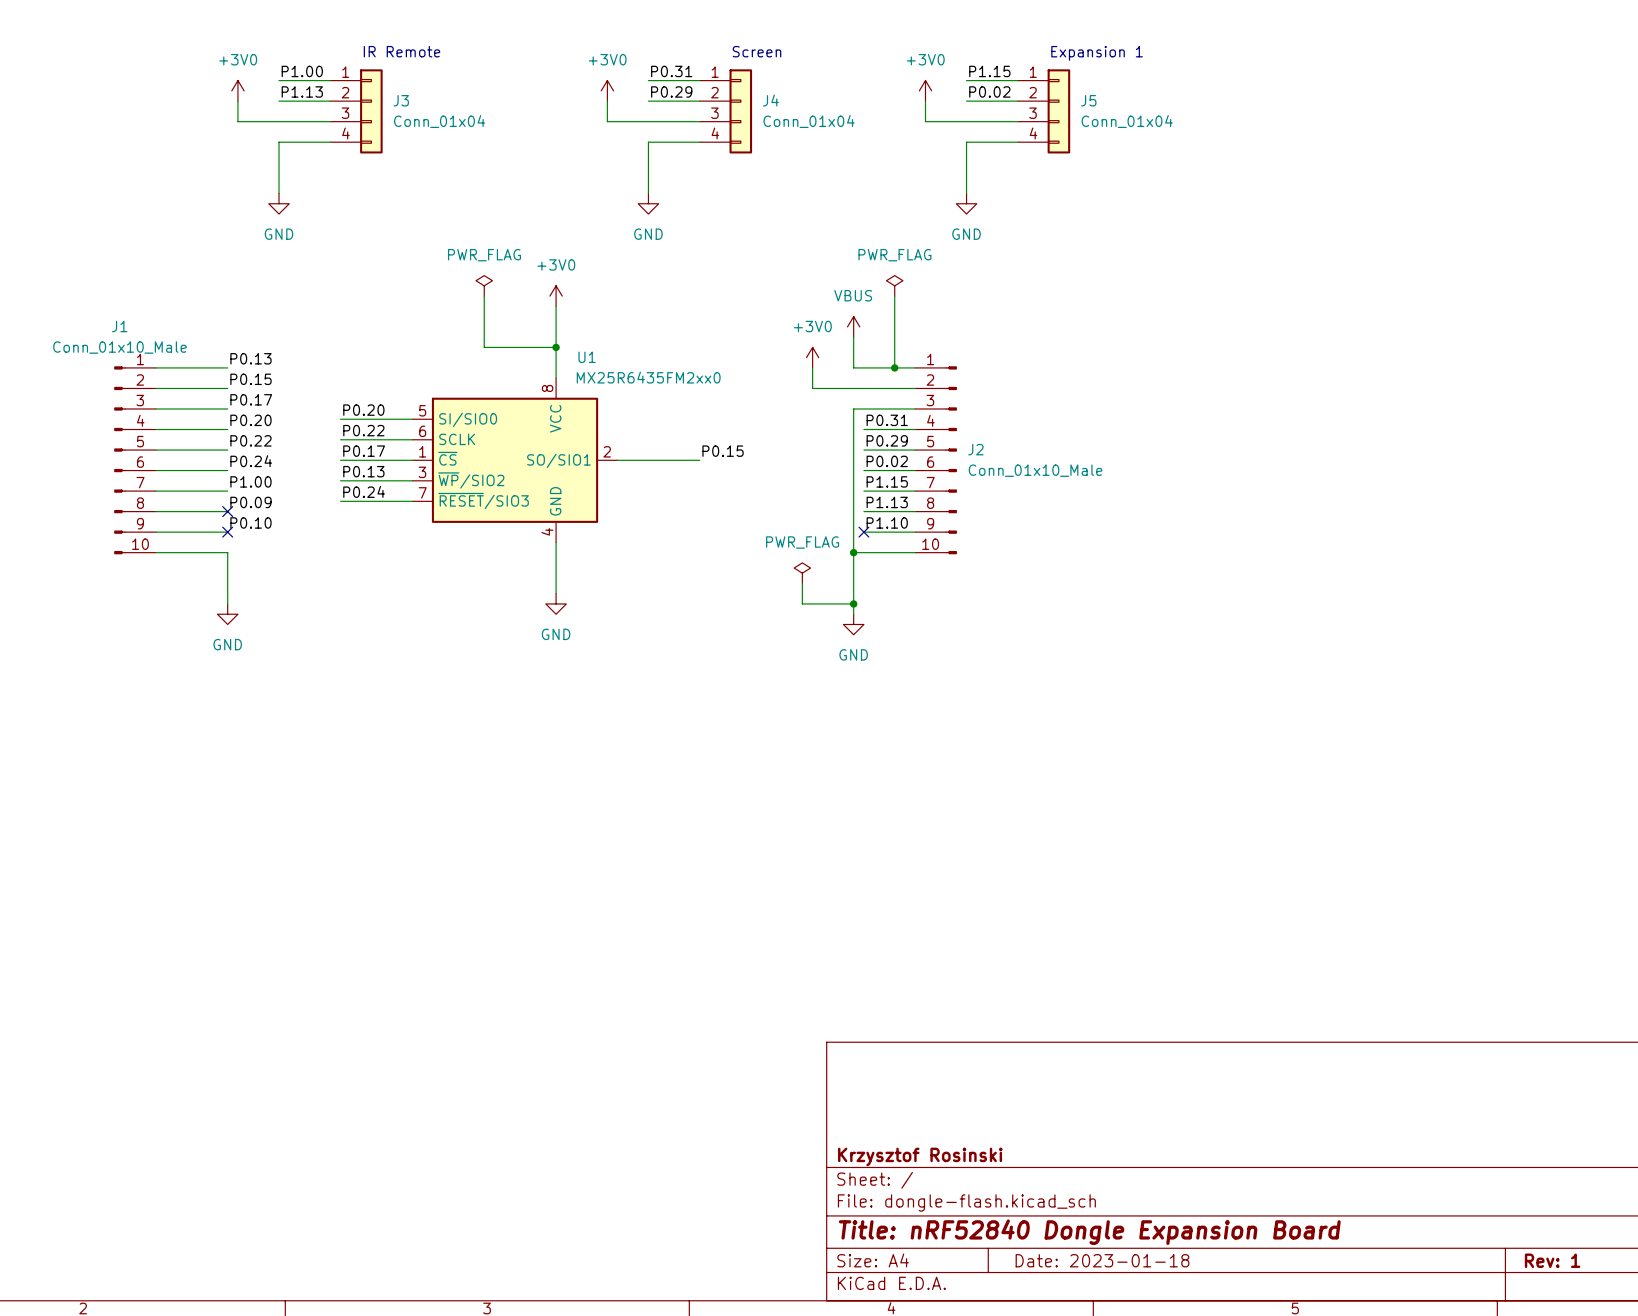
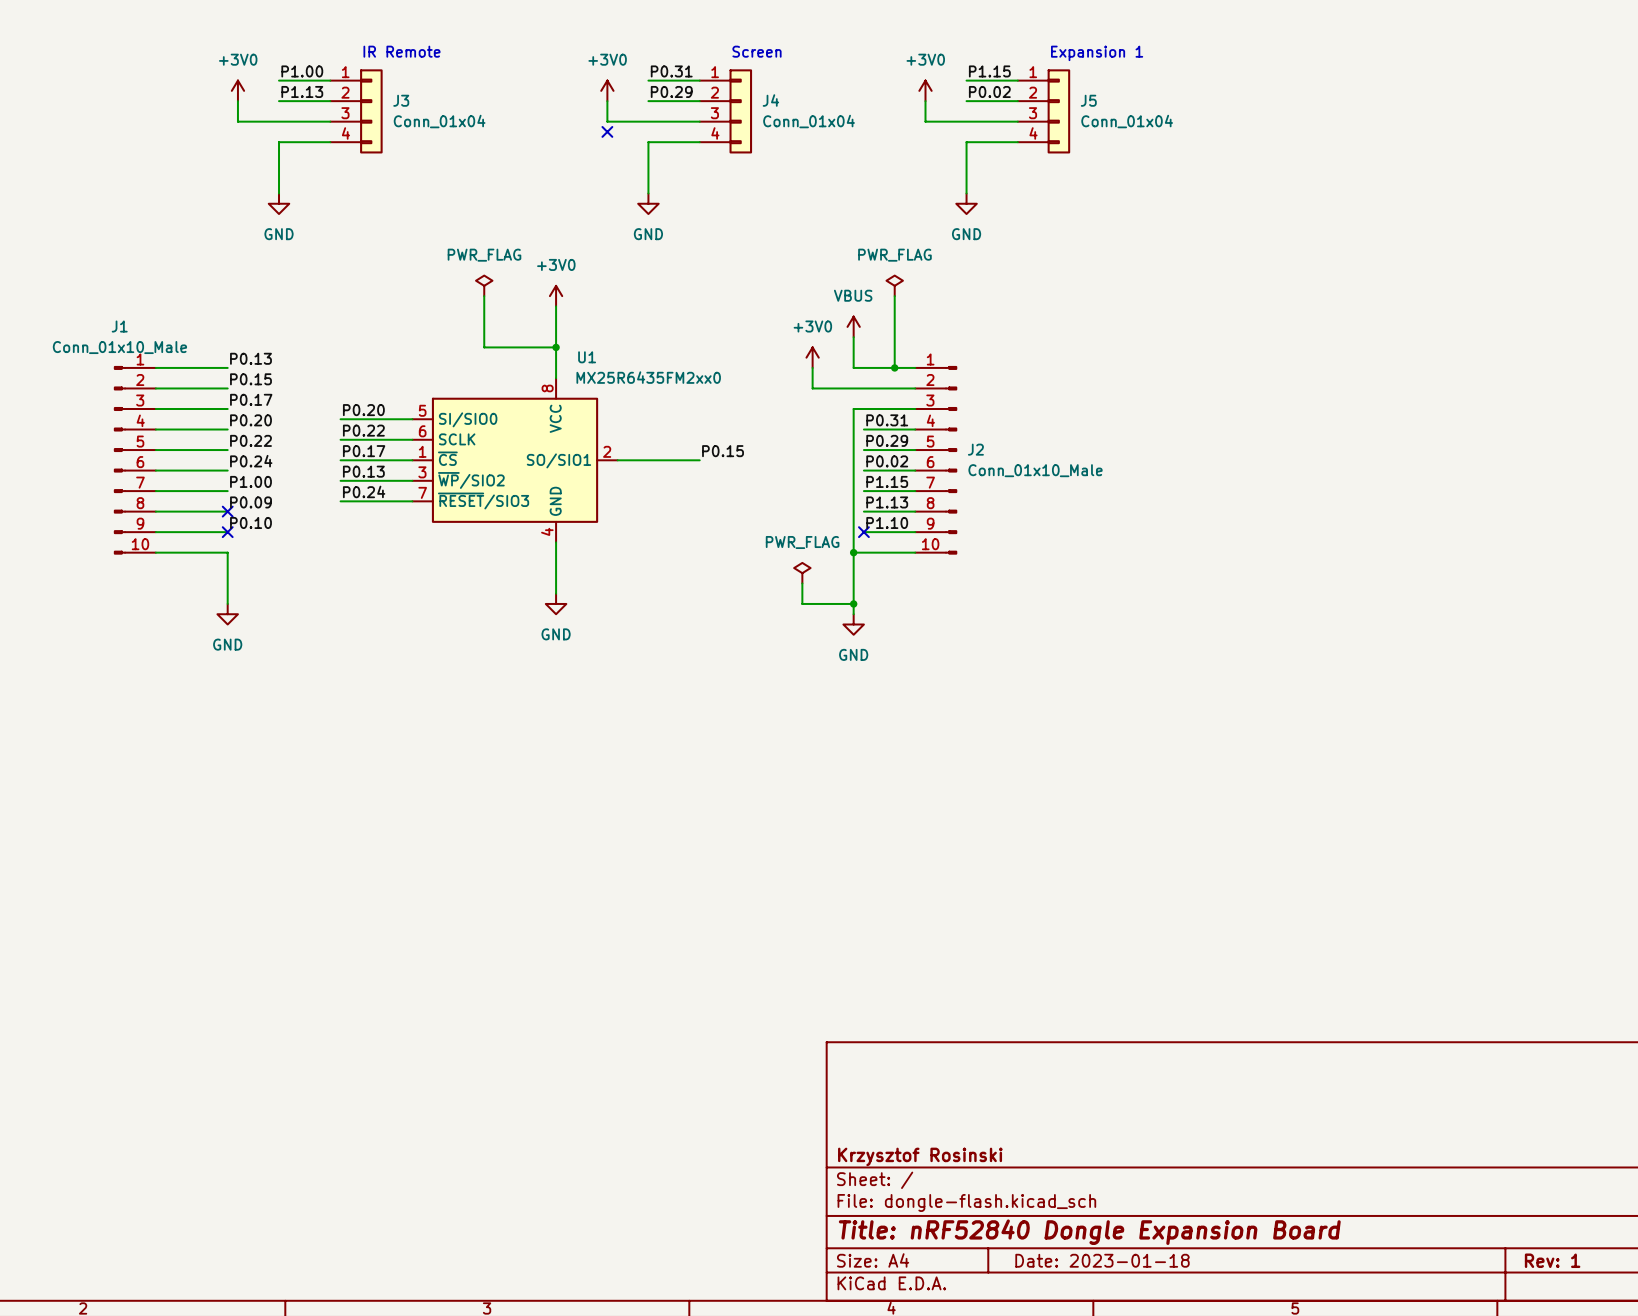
no-connect mark: none -> (607, 131)

